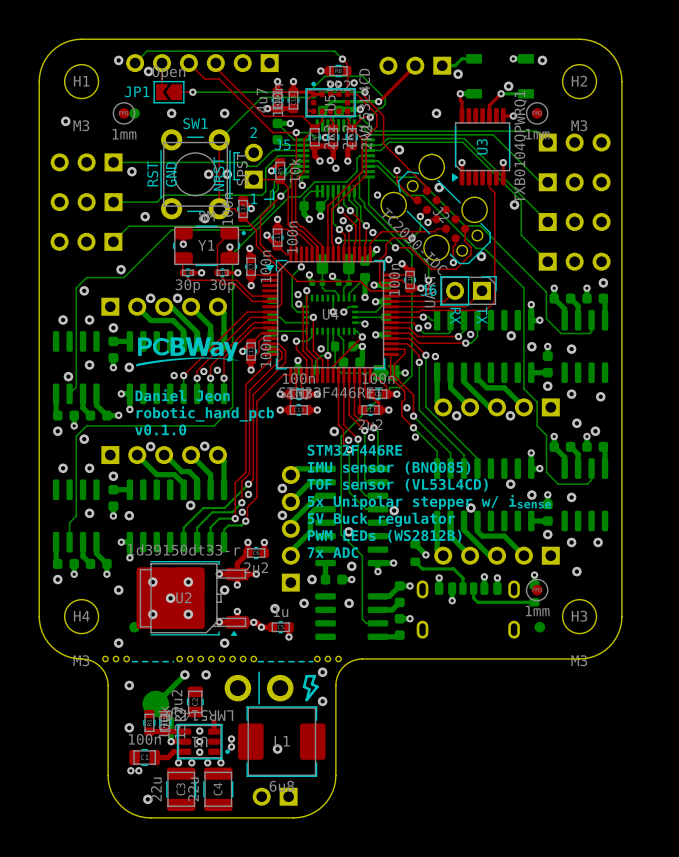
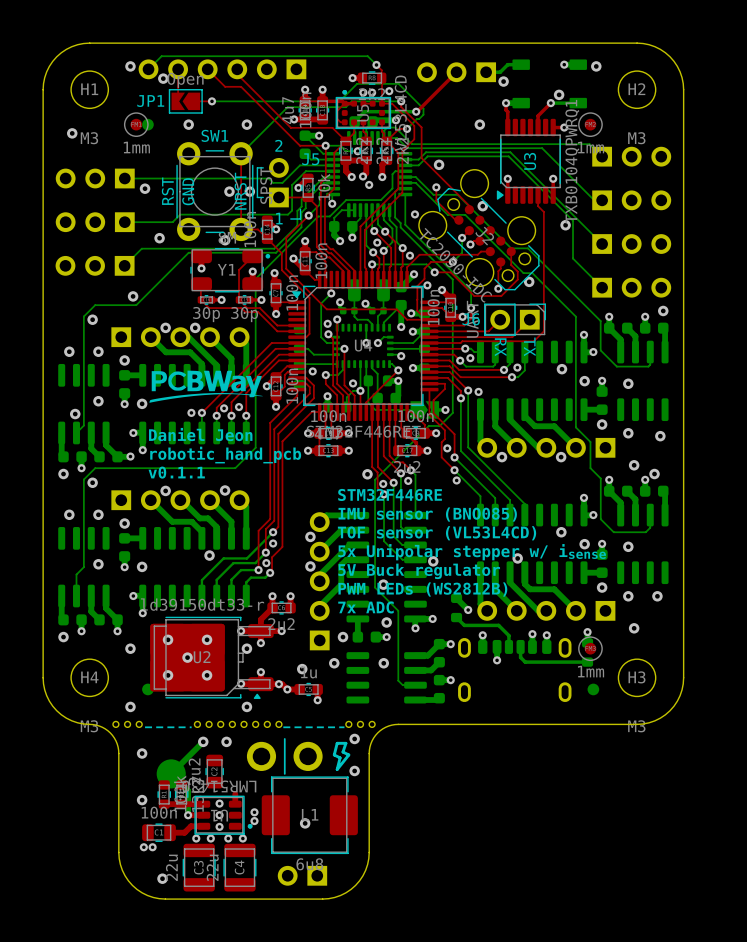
text: v0.1.0 (160, 429) -> v0.1.1 (176, 472)

